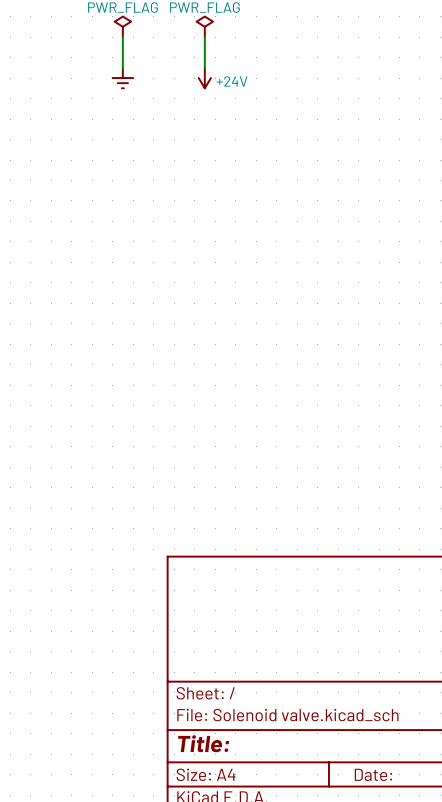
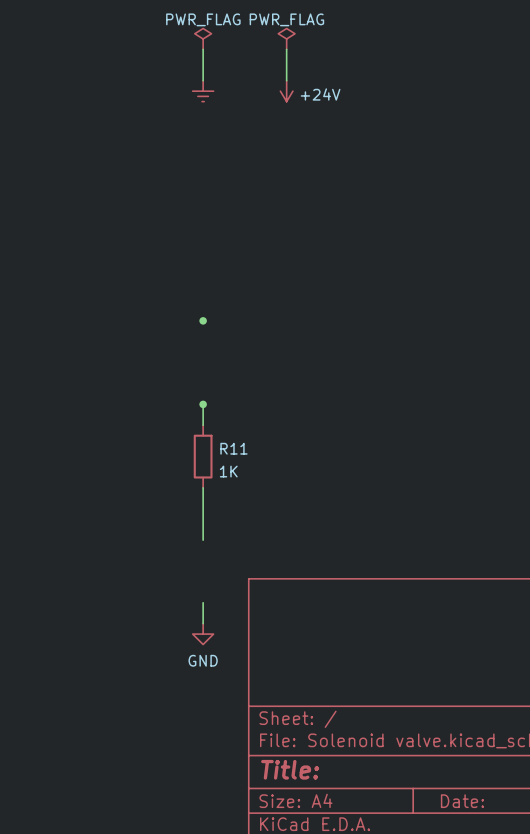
junction: none -> (203, 320)
wire: none -> (203, 404) (203, 425)
junction: none -> (203, 404)
R11: none -> 1K (203, 456)
wire: none -> (203, 487) (203, 540)
wire: none -> (203, 602) (203, 623)
power symbol: none -> GND (203, 634)

